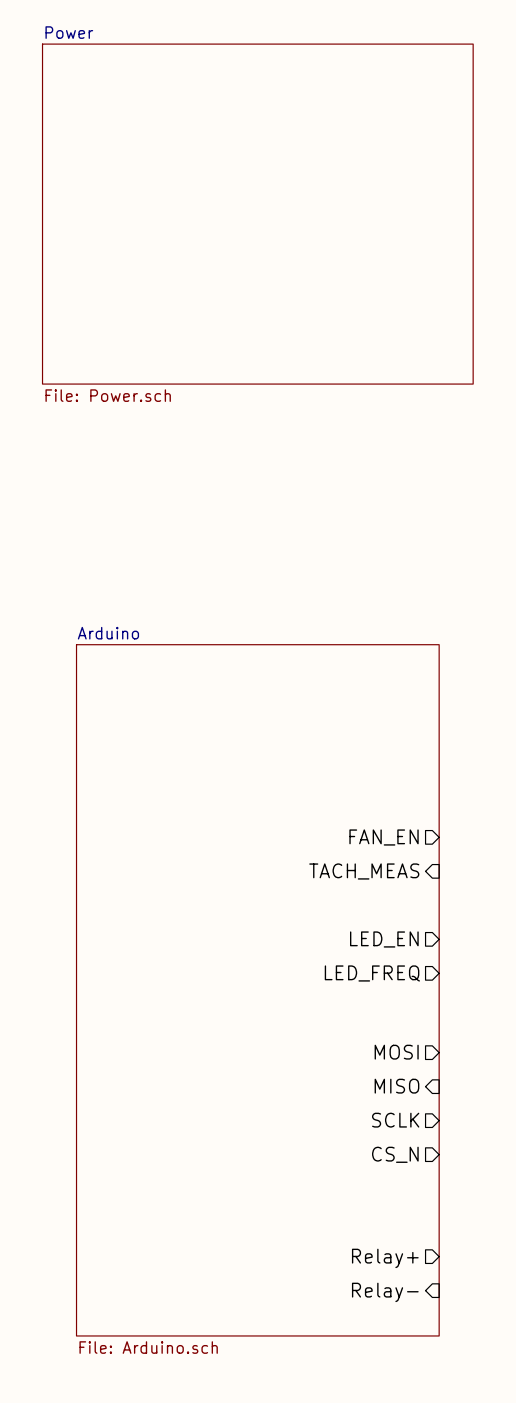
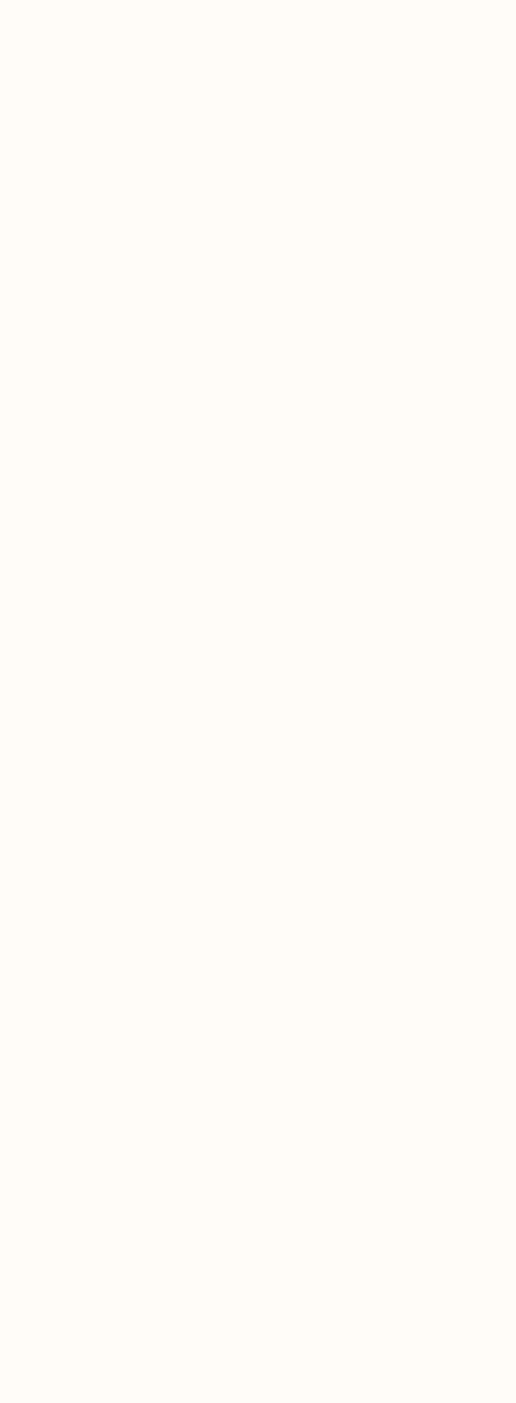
sheet Power: File: Power.sch (257, 214) -> none
sheet pin: FAN_EN (384, 837) -> none
sheet pin: TACH_MEAS (364, 871) -> none
sheet pin: LED_EN (384, 939) -> none
sheet pin: LED_FREQ (372, 973) -> none
sheet Arduino: File: Arduino.sch (257, 990) -> none
sheet pin: MOSI (396, 1052) -> none
sheet pin: MISO (396, 1086) -> none
sheet pin: SCLK (395, 1120) -> none
sheet pin: CS_N (395, 1154) -> none
sheet pin: Relay+ (385, 1258) -> none
sheet pin: Relay- (385, 1292) -> none

